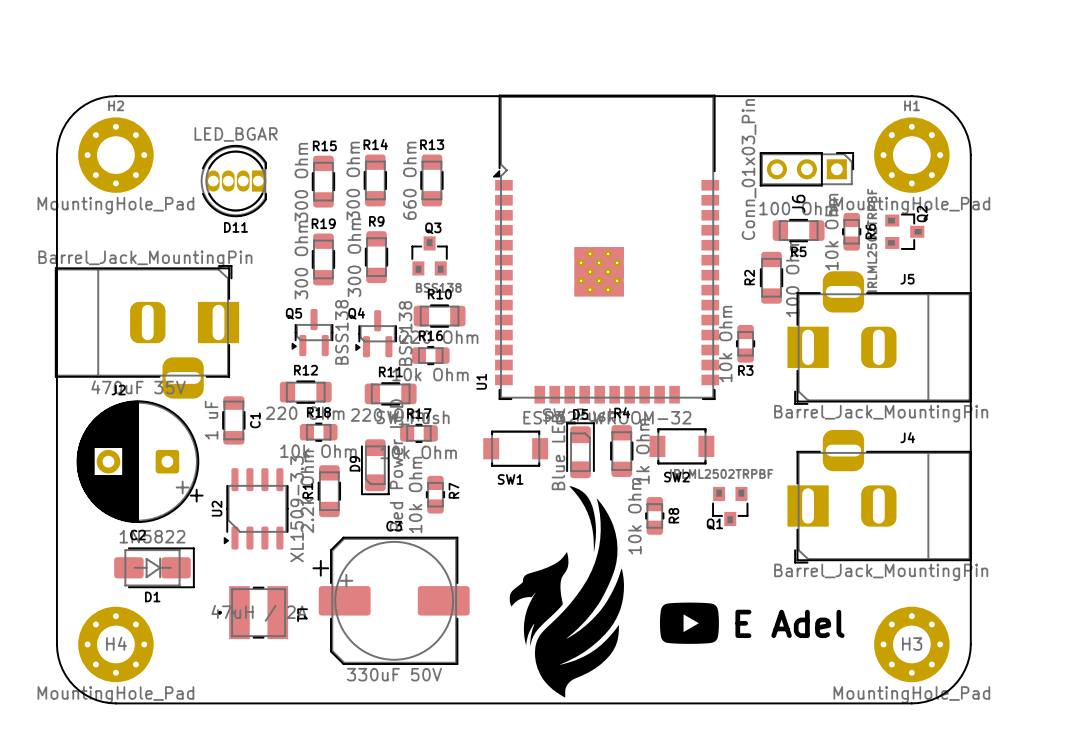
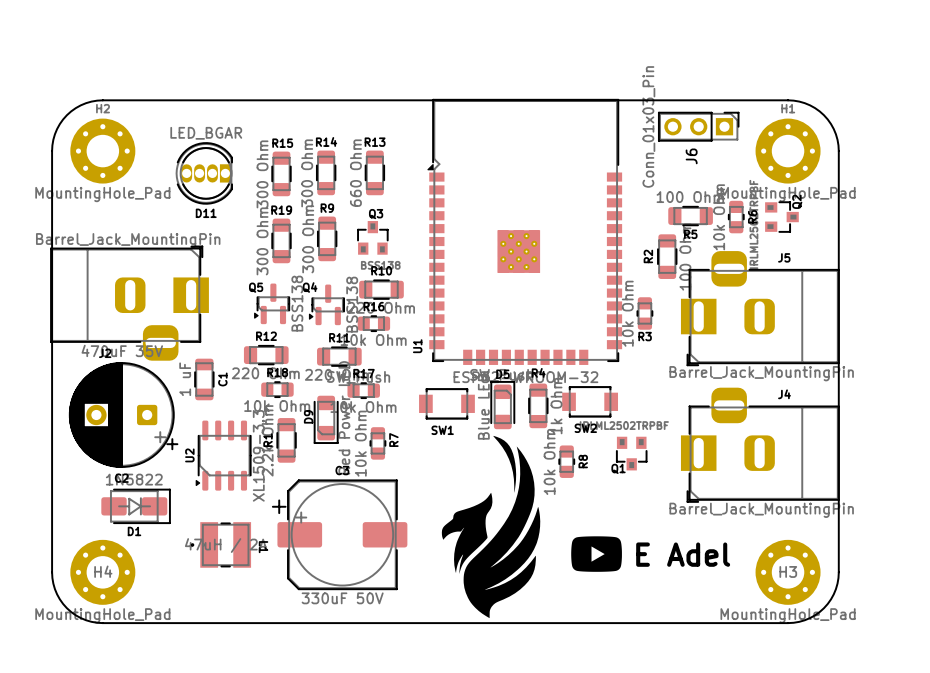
J6 position: (806, 169) -> (698, 126)

